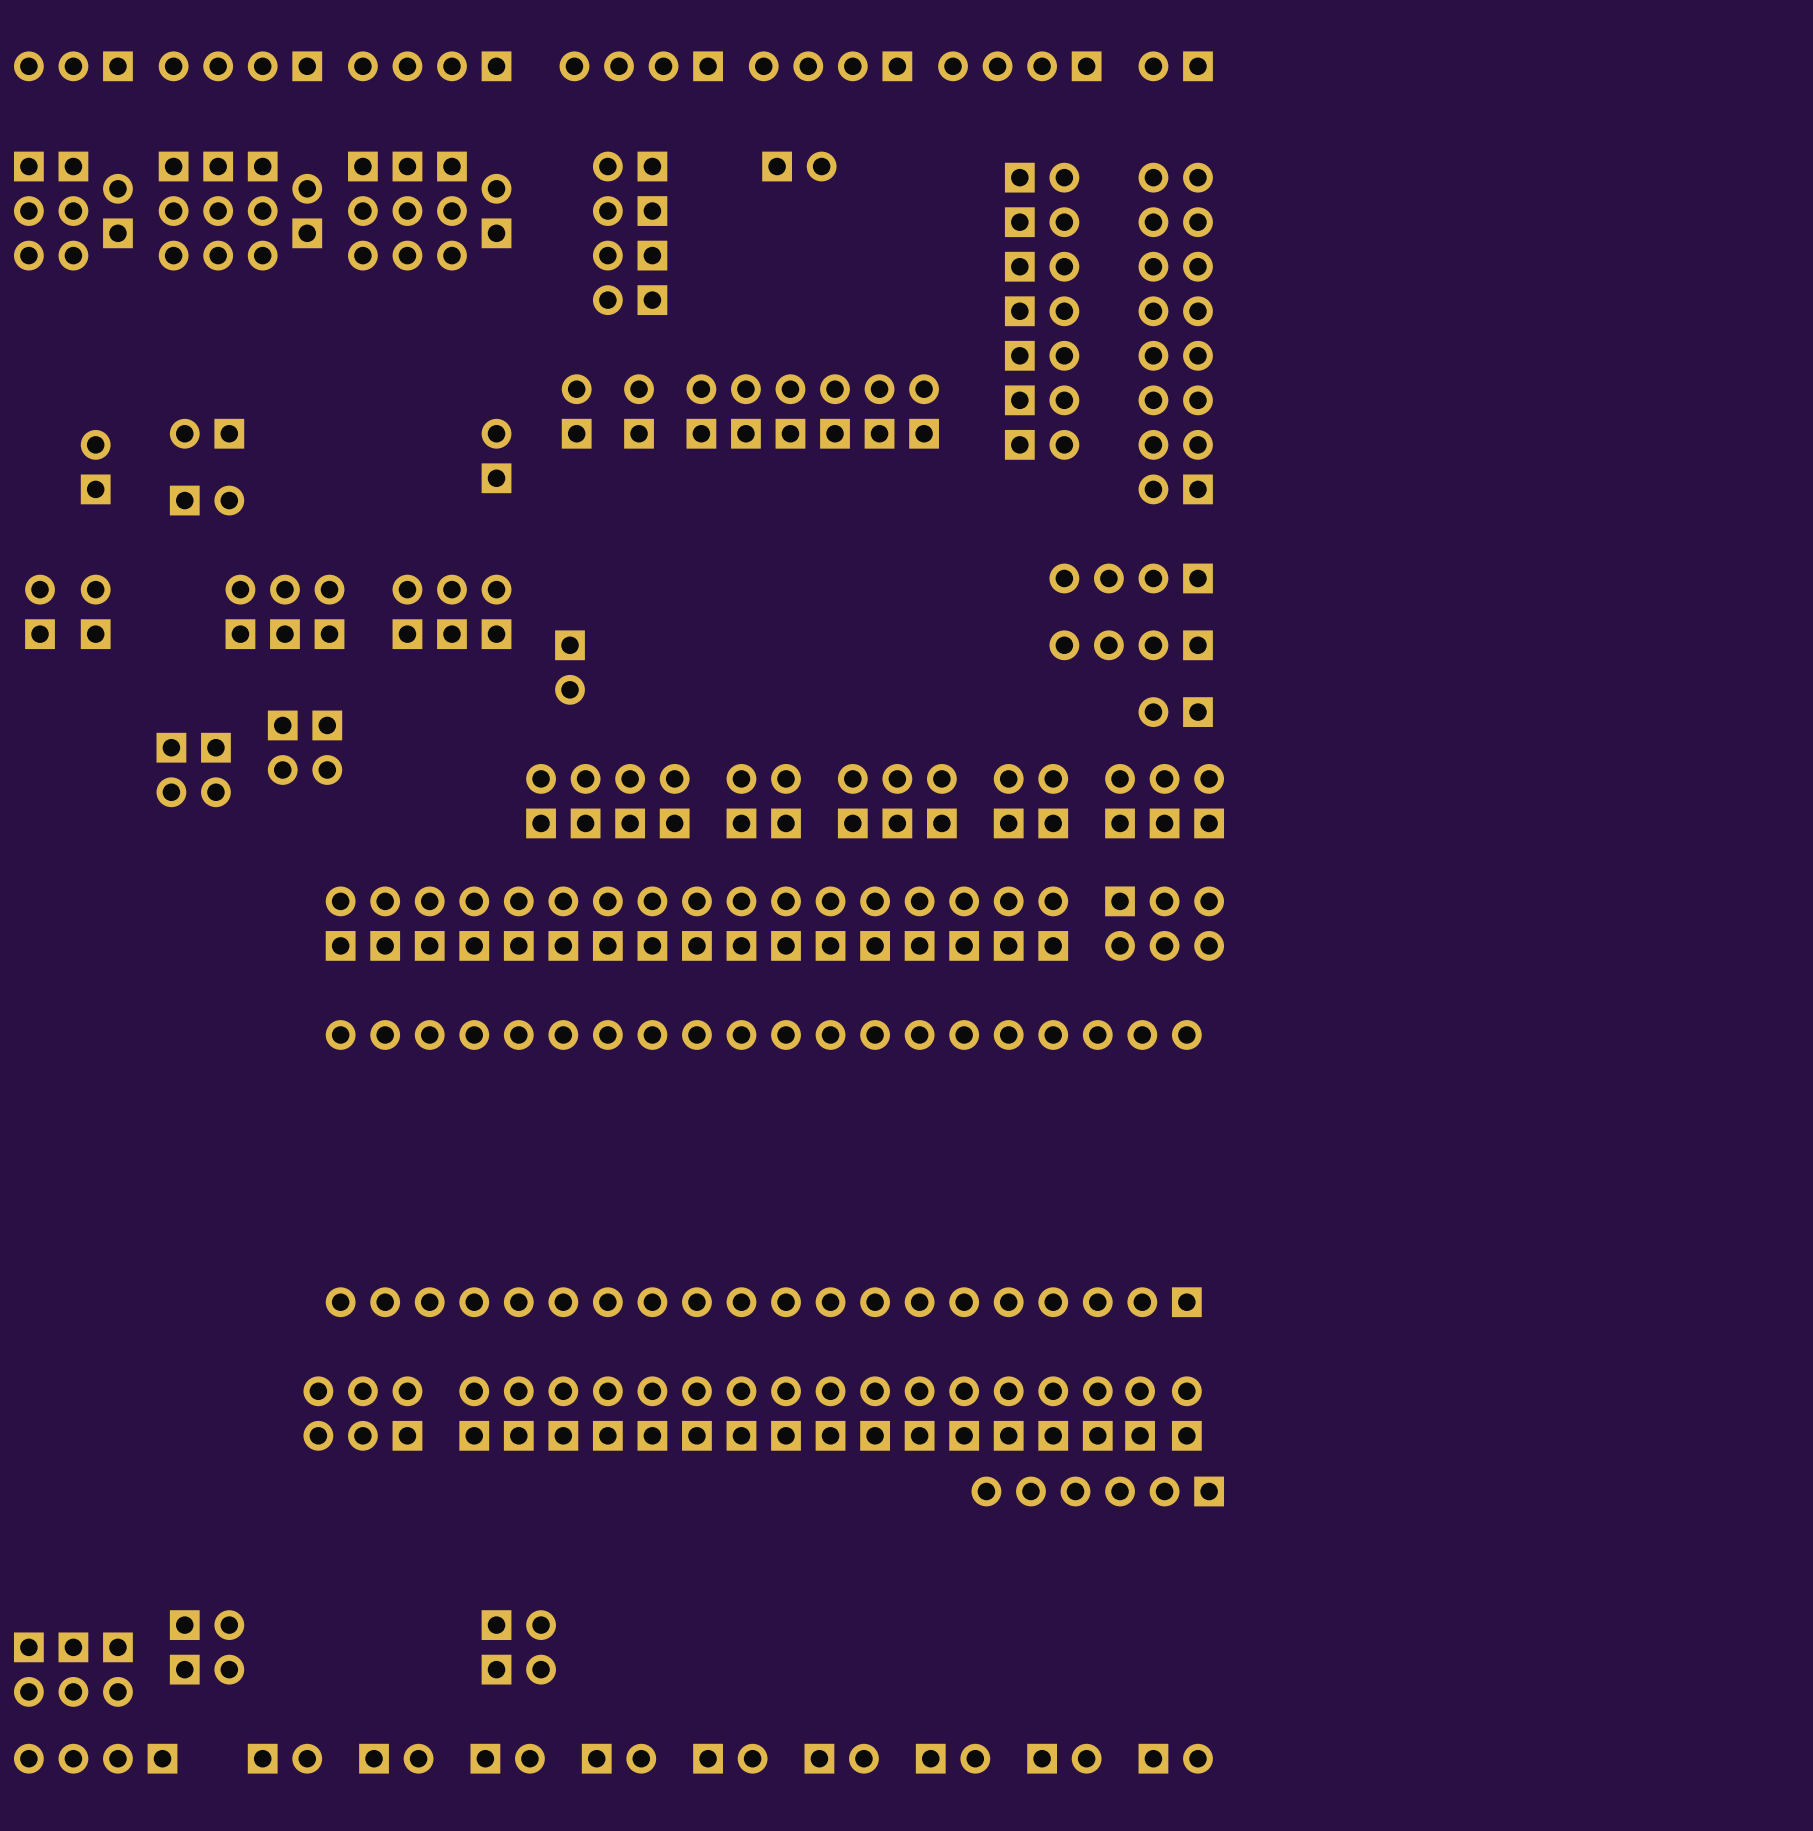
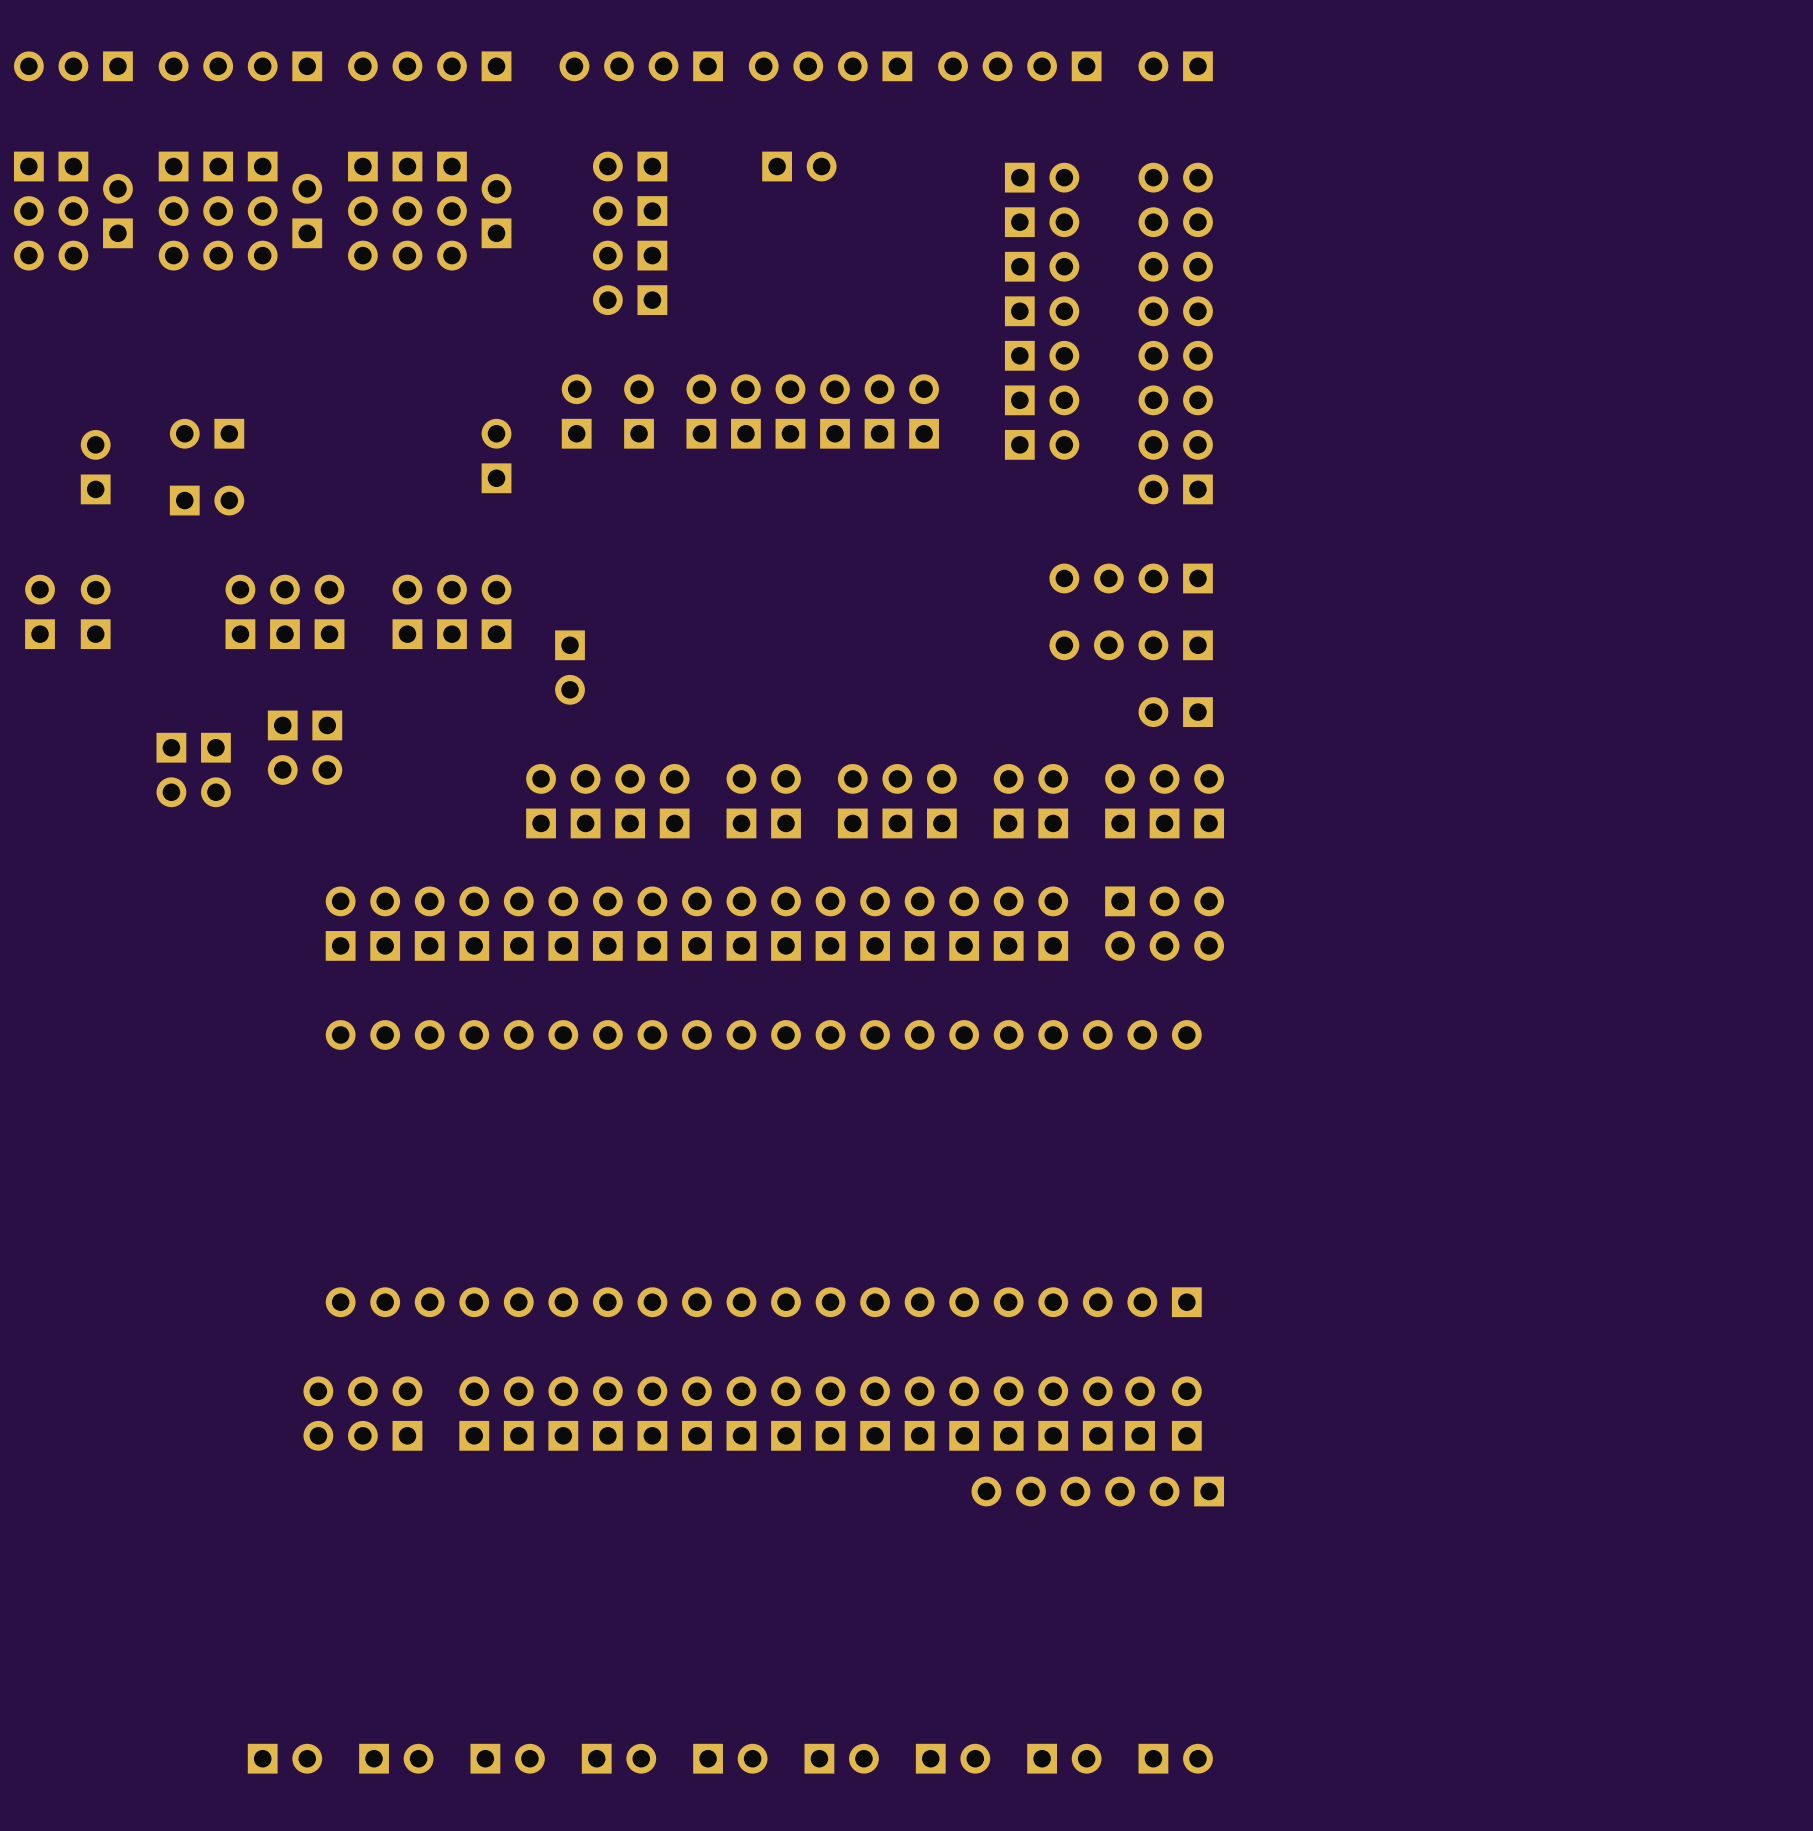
part: (207, 1625) -> none
part: (518, 1625) -> none
part: (28, 1669) -> none
part: (73, 1669) -> none
part: (117, 1669) -> none
part: (207, 1669) -> none
part: (518, 1669) -> none
part: (95, 1758) -> none

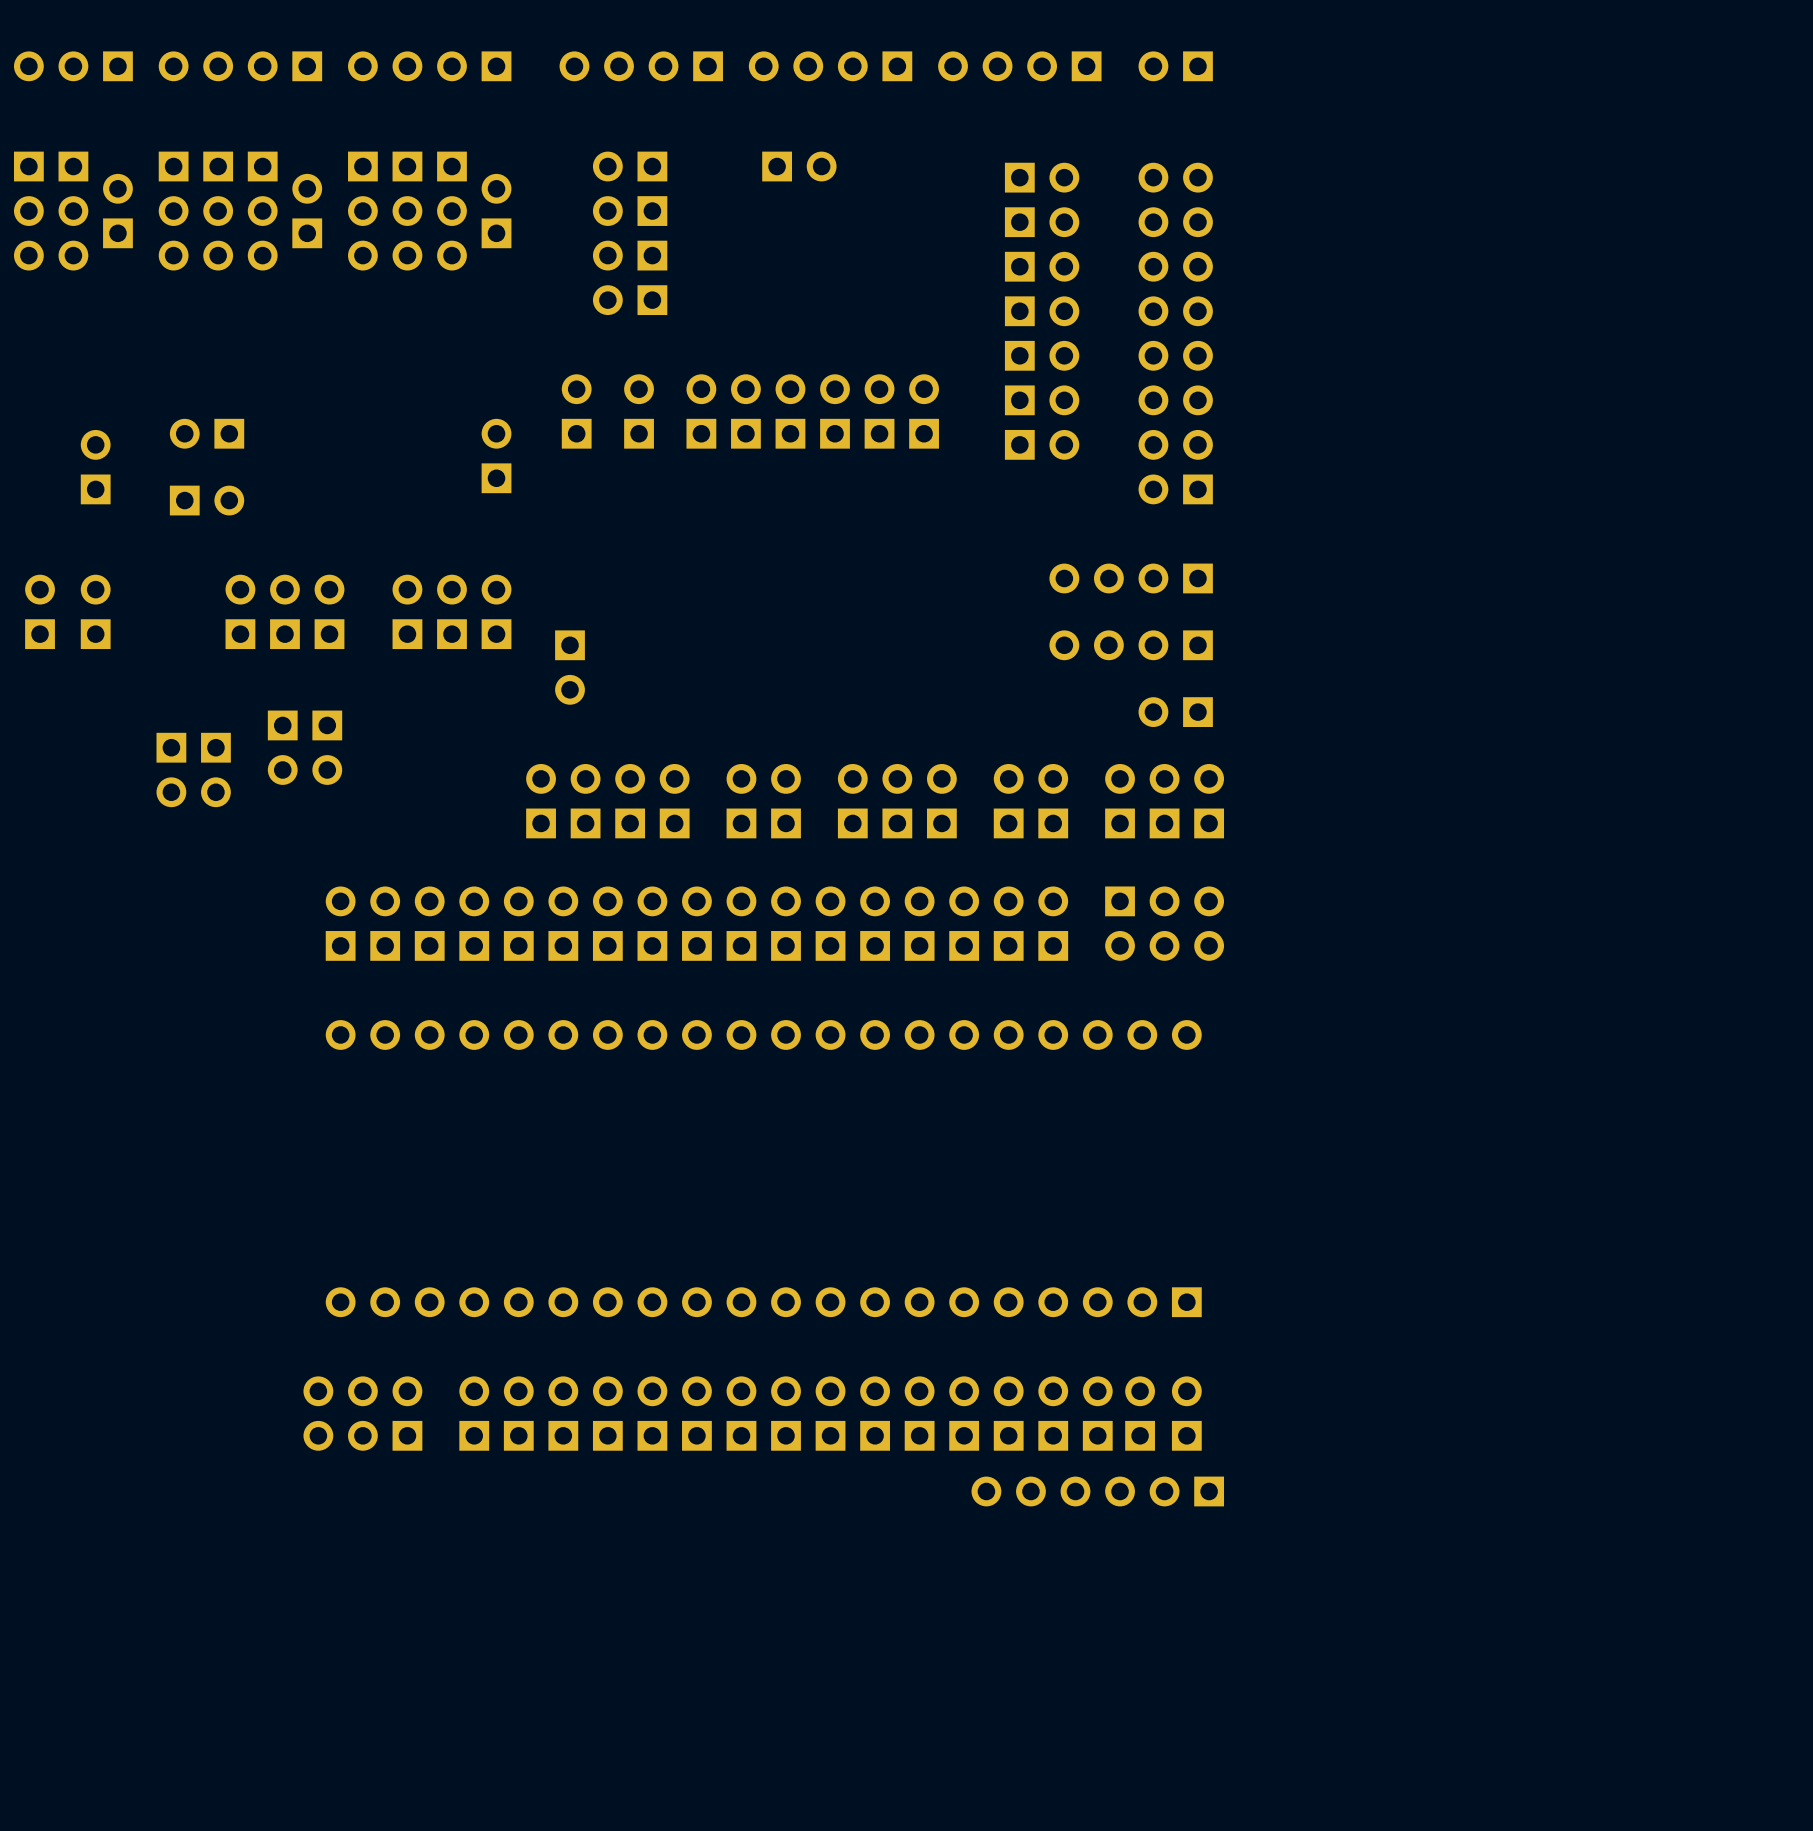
part: (284, 1758) -> none
part: (396, 1758) -> none
part: (507, 1758) -> none
part: (619, 1758) -> none
part: (730, 1758) -> none
part: (841, 1758) -> none
part: (953, 1758) -> none
part: (1064, 1758) -> none
part: (1175, 1758) -> none

